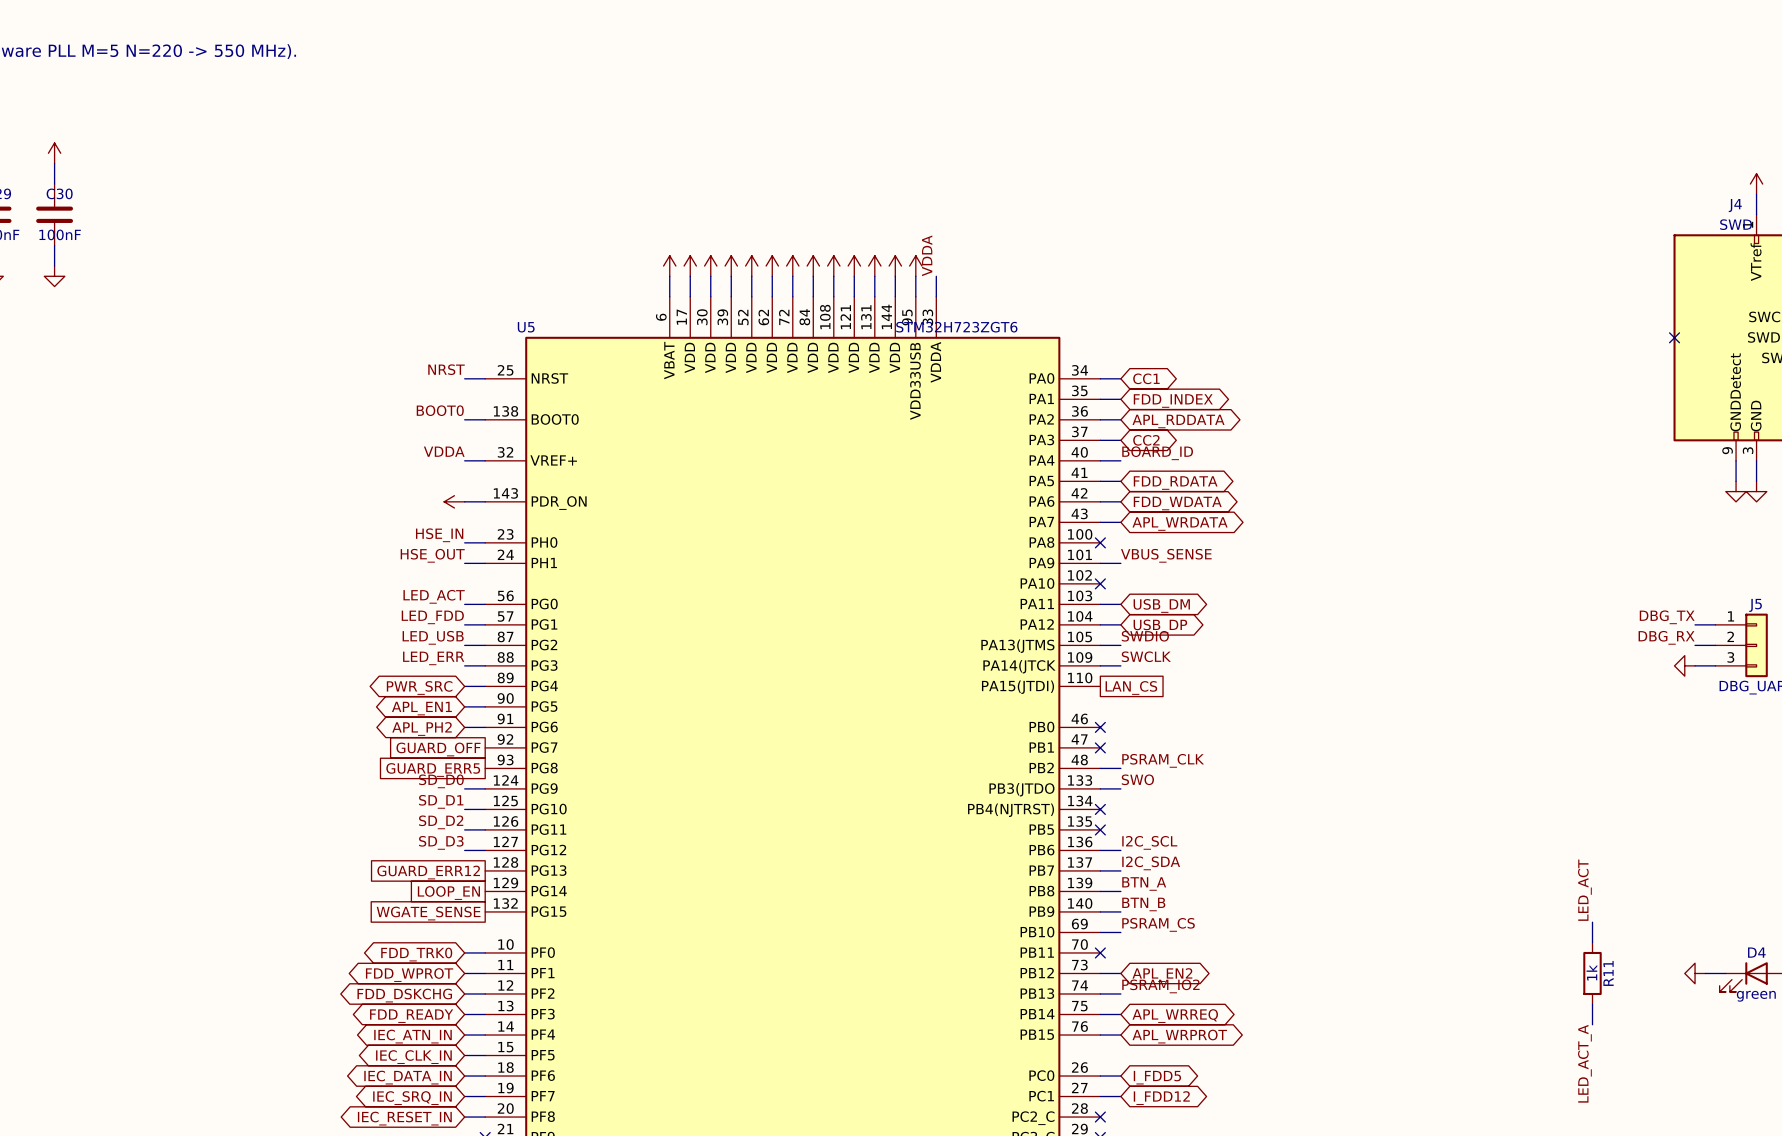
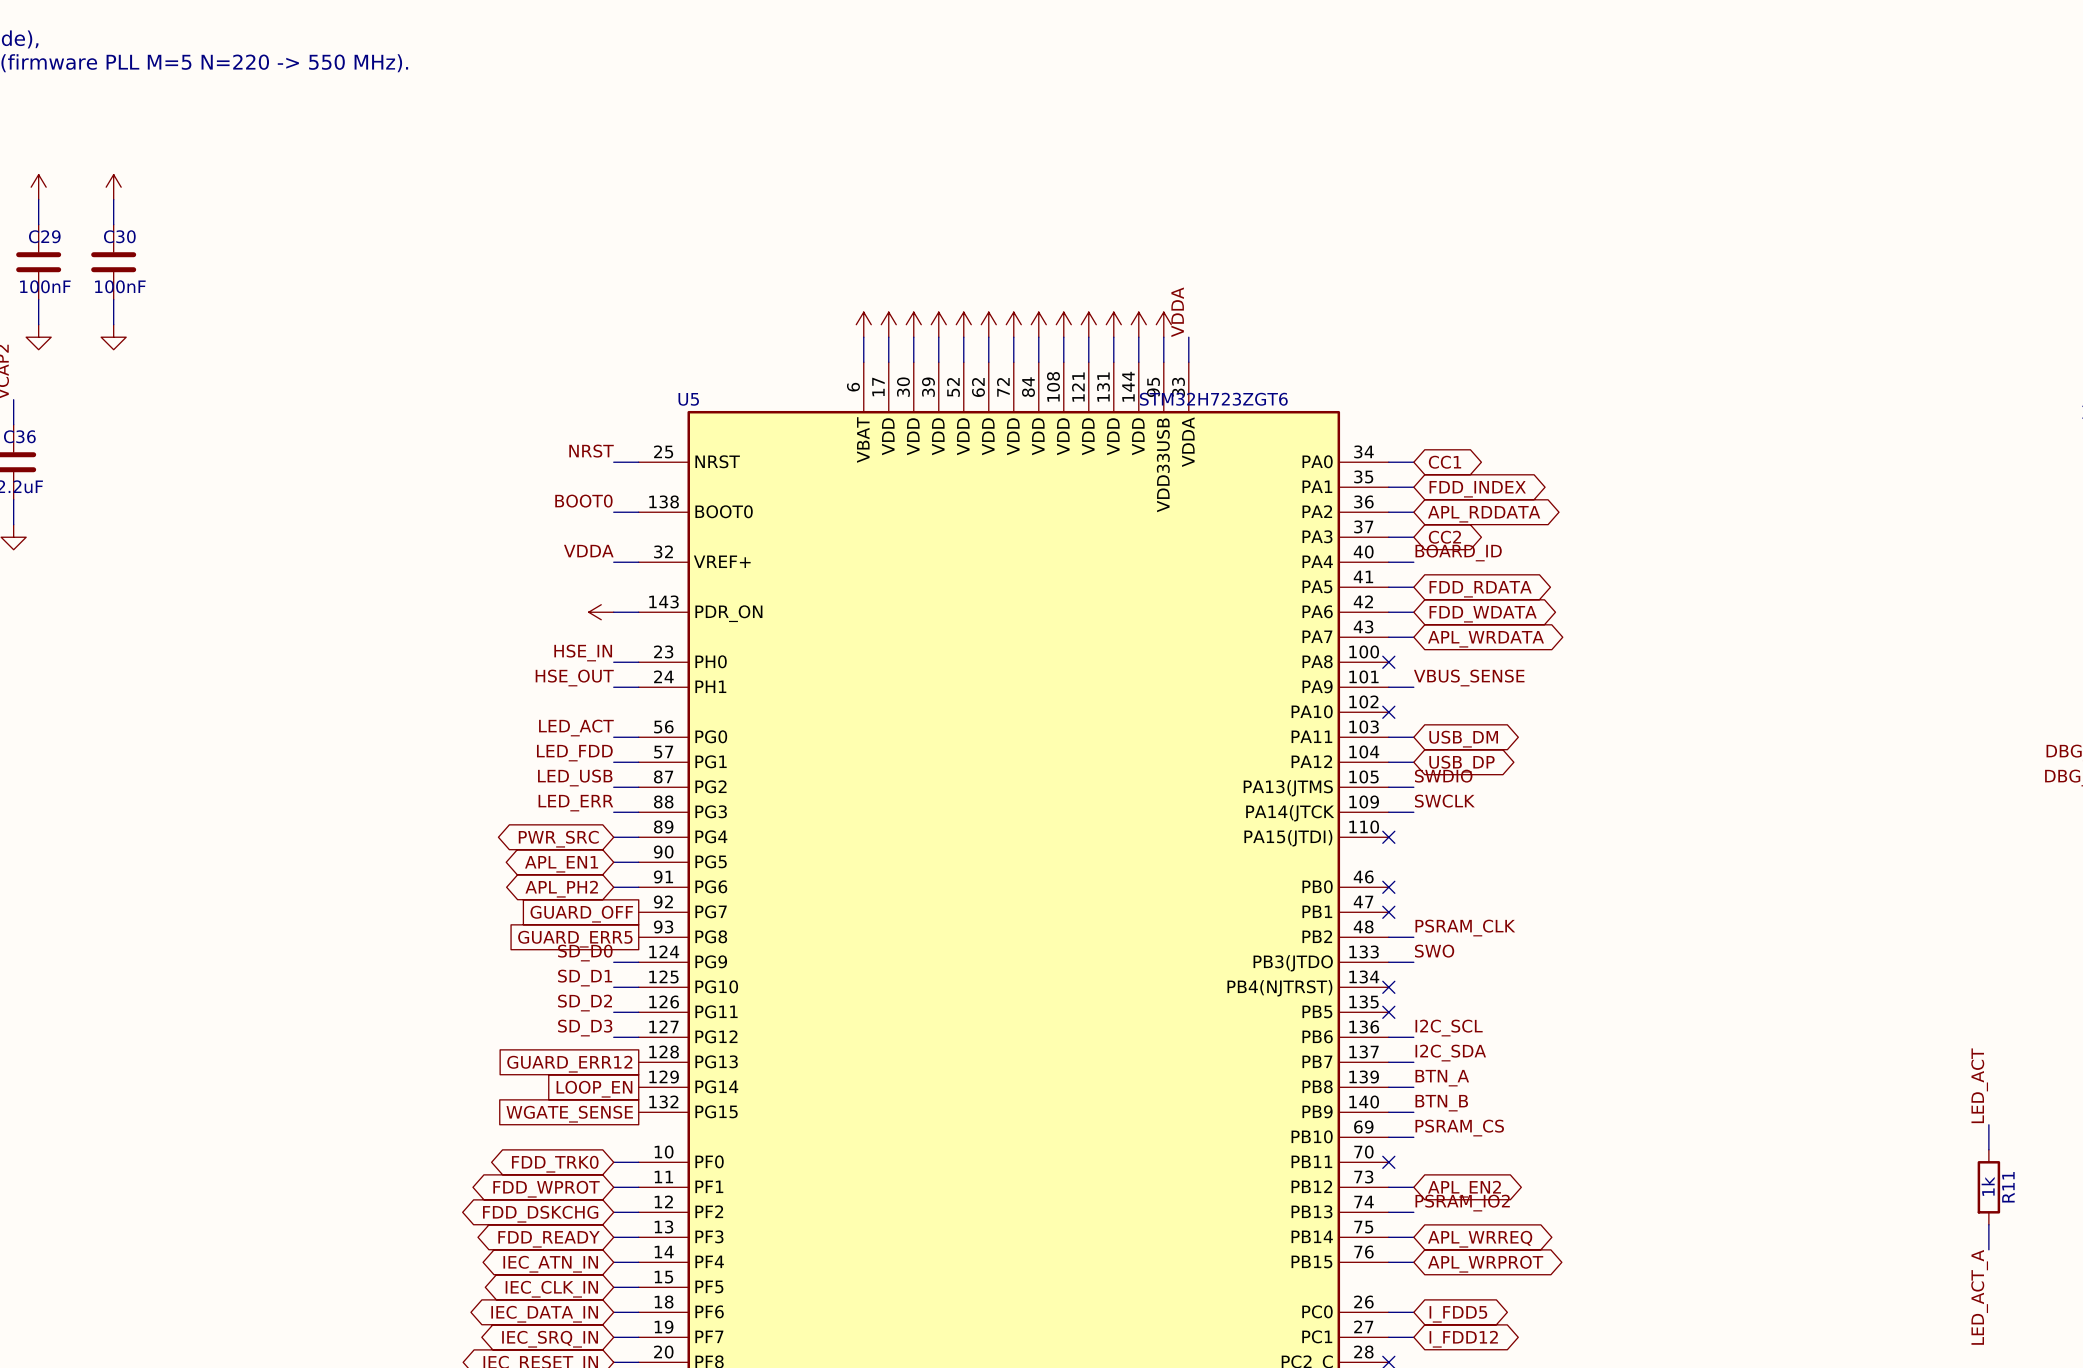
no-connect mark: none -> (1388, 837)
global label: LAN_CS (1131, 687) -> none

